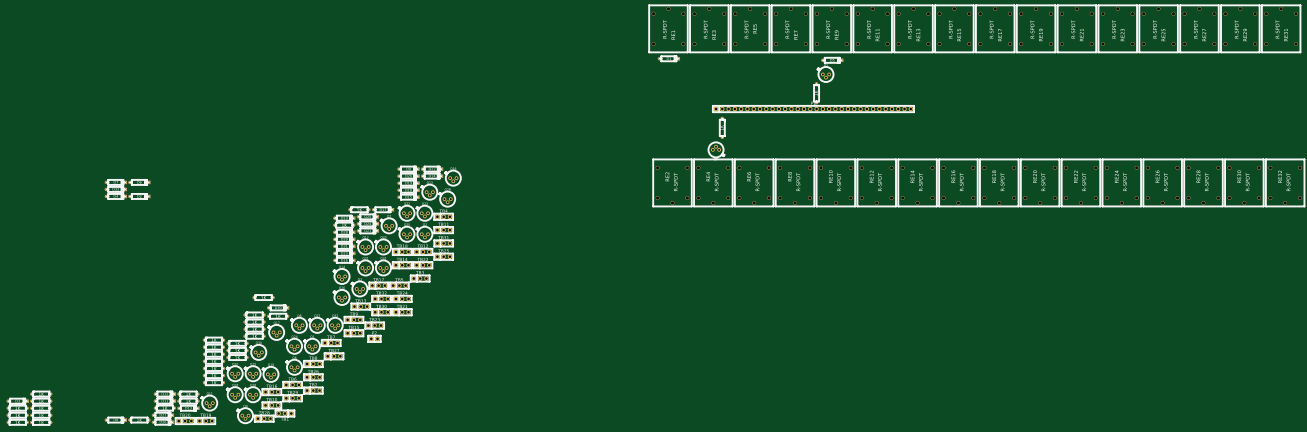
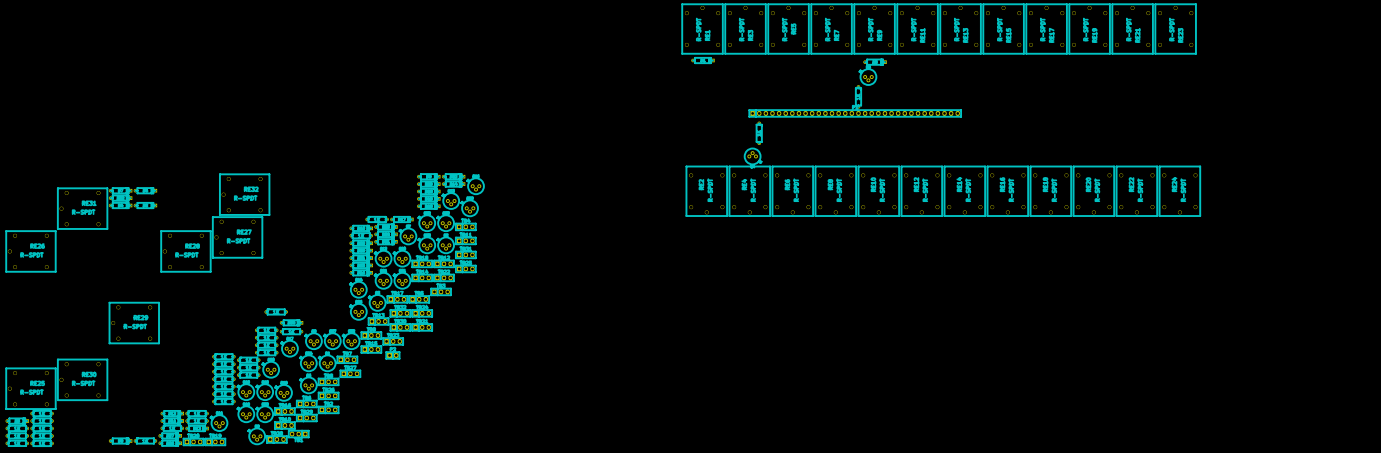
part rotation: 0° (1158, 28) -> 90° counterclockwise (30, 388)
part position: (1158, 28) -> (30, 388)
part rotation: 0° (1199, 28) -> 90° counterclockwise (237, 237)
part position: (1199, 28) -> (237, 237)
part rotation: 0° (1240, 28) -> 90° counterclockwise (134, 323)
part position: (1240, 28) -> (134, 323)
part rotation: 0° (1281, 28) -> 90° counterclockwise (82, 208)
part position: (1281, 28) -> (82, 208)
part rotation: 0° (1162, 182) -> 90° clockwise (30, 251)
part position: (1162, 182) -> (30, 251)
part rotation: 0° (1203, 182) -> 90° clockwise (185, 251)
part position: (1203, 182) -> (185, 251)
part rotation: 0° (1244, 182) -> 90° clockwise (82, 379)
part position: (1244, 182) -> (82, 379)
part rotation: 0° (1285, 182) -> 90° clockwise (244, 194)
part position: (1285, 182) -> (244, 194)

